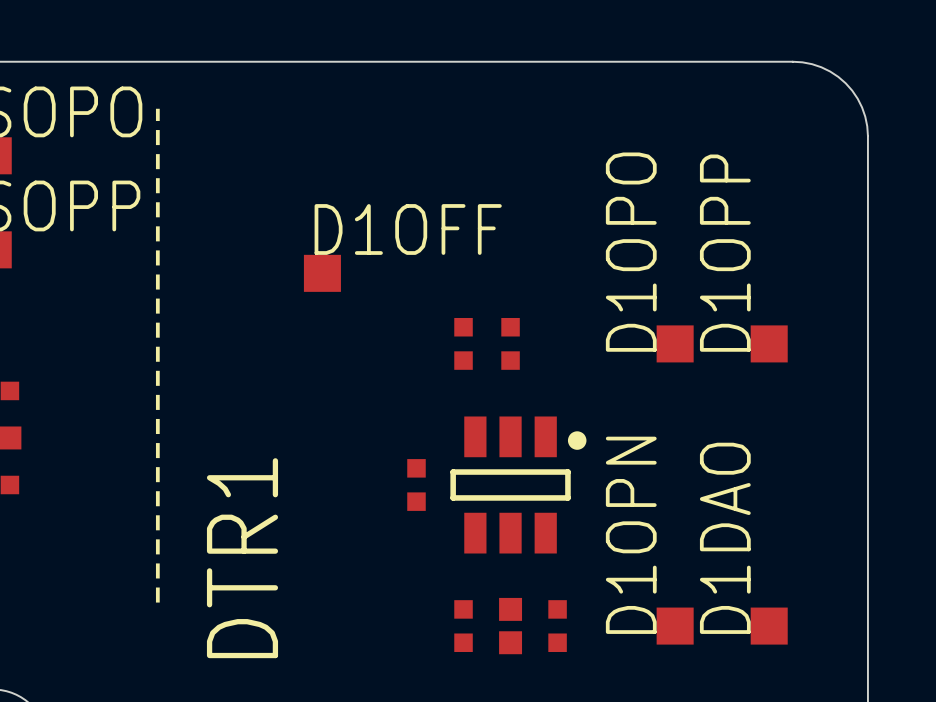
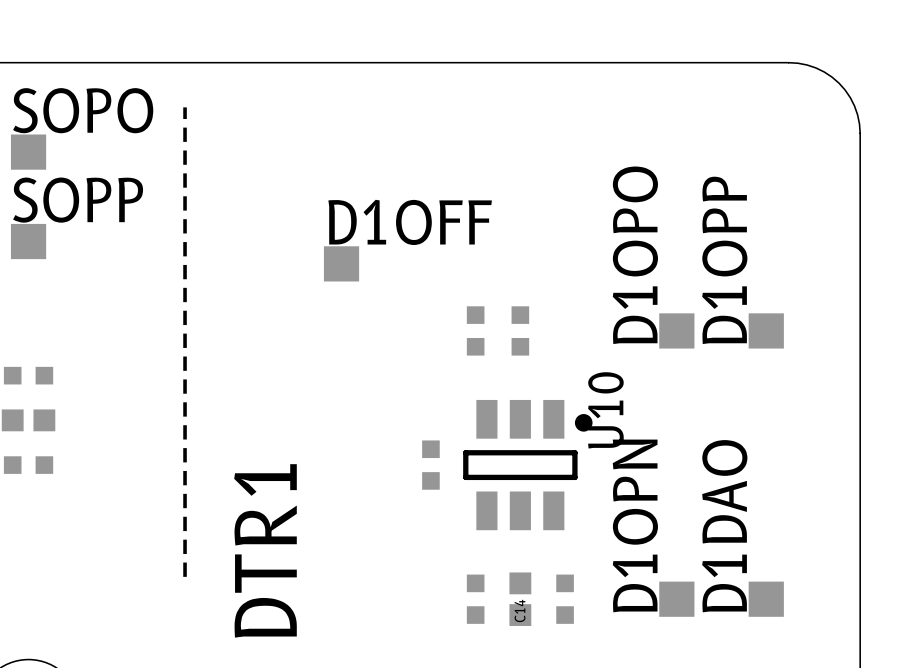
U10 name: none -> U10 (605, 410)
C14 name: none -> C14 (520, 610)

